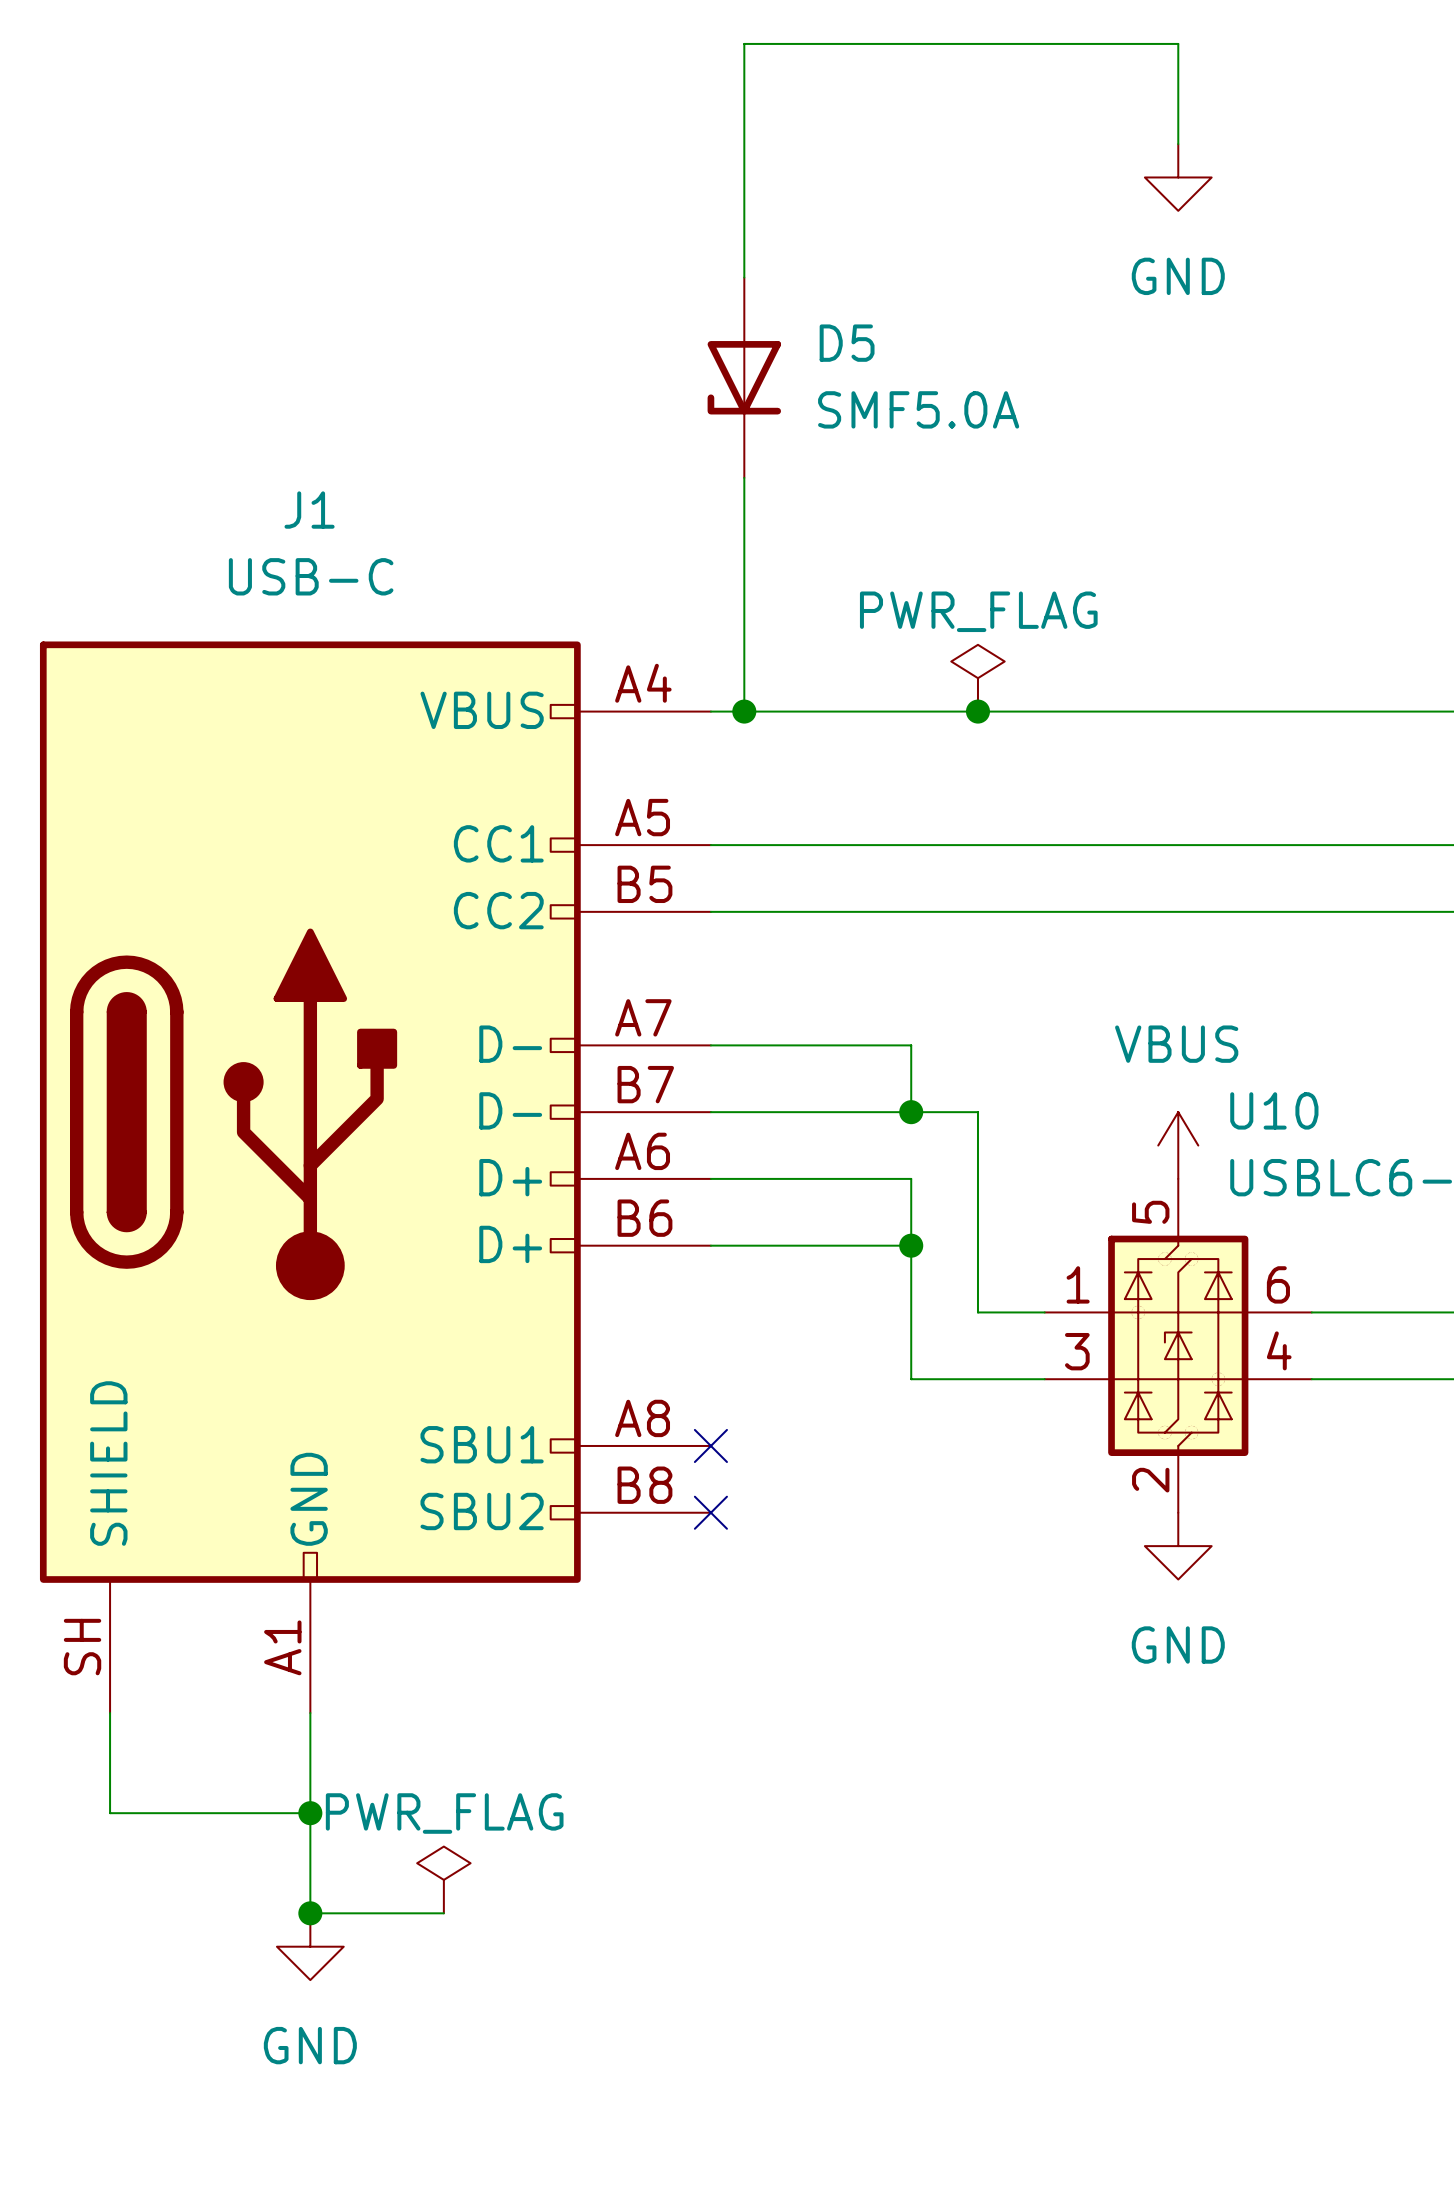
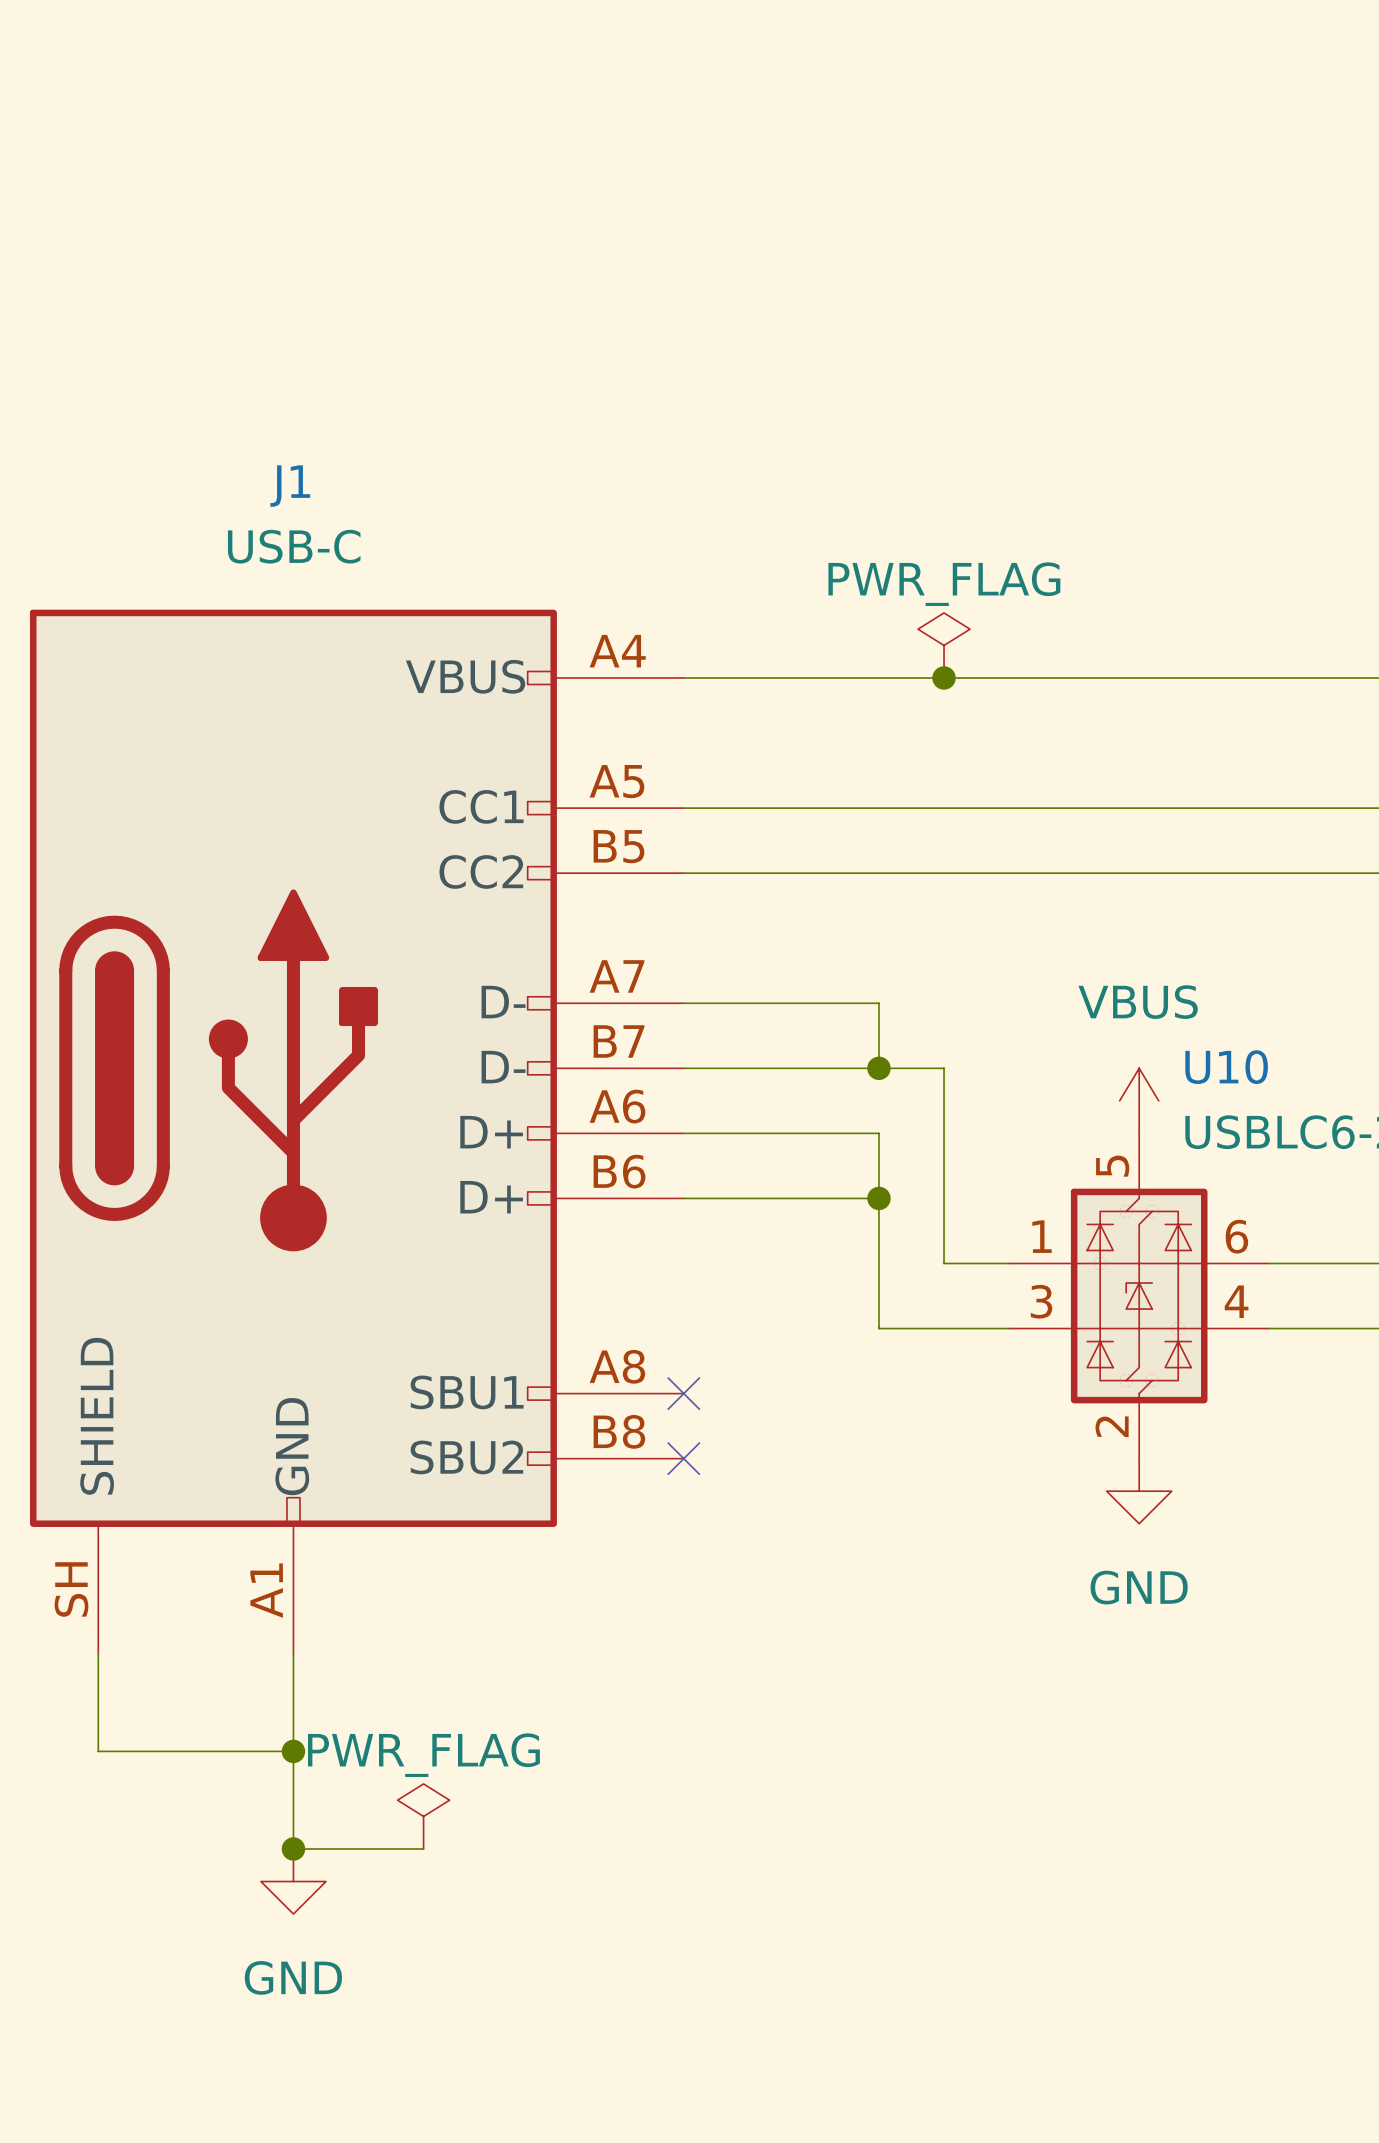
wire: (1178, 144) (1178, 43) (744, 43) (744, 277) -> none
power symbol: GND (1178, 177) -> none
D5: SMF5.0A (744, 377) -> none
wire: (744, 477) (744, 711) -> none
junction: (744, 711) -> none

